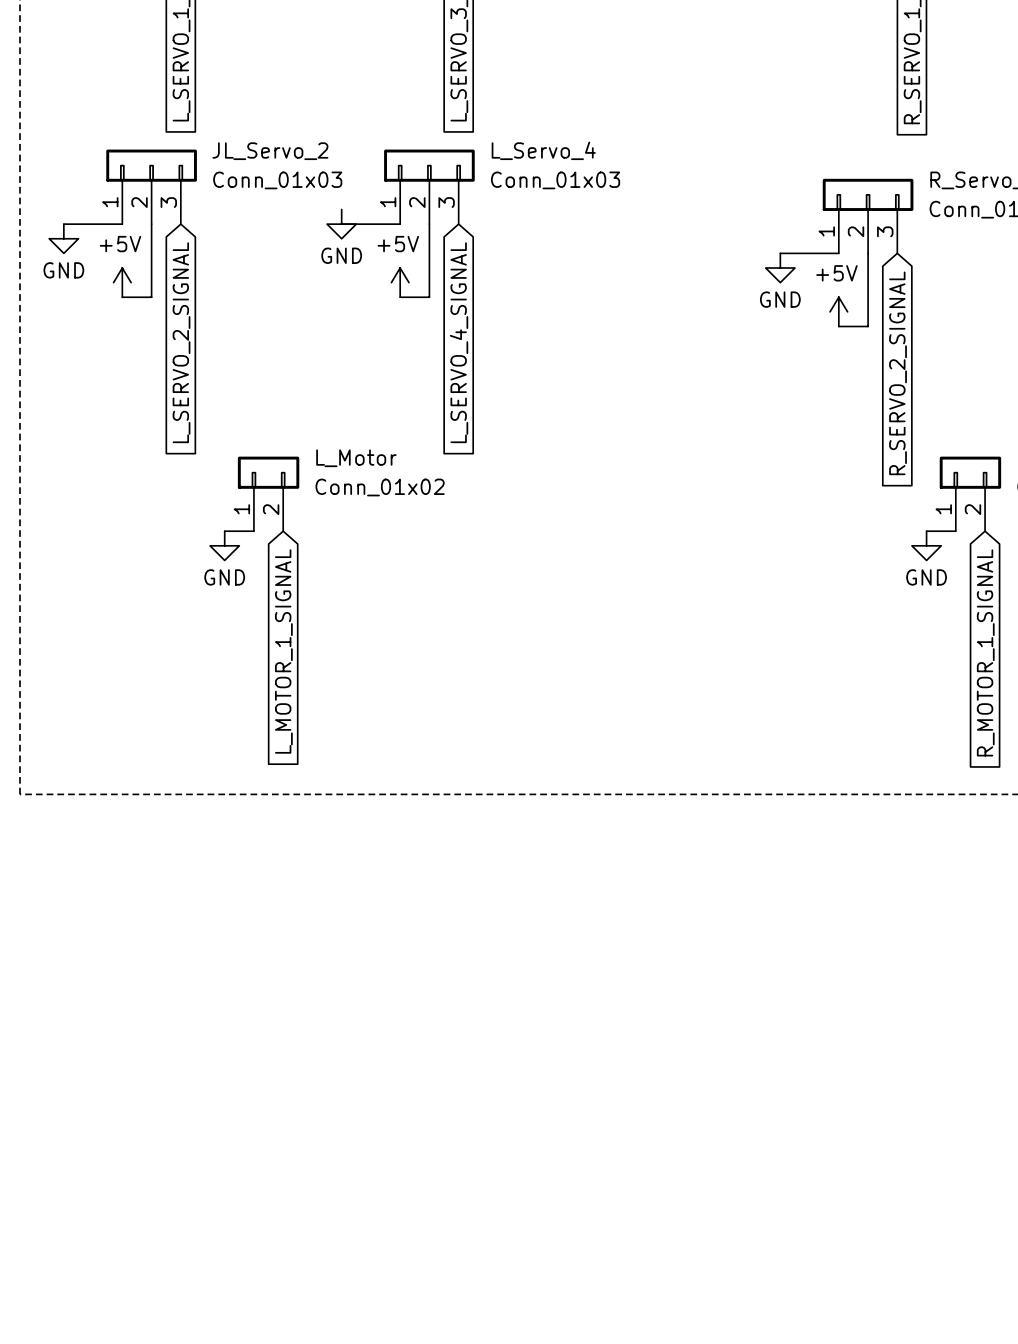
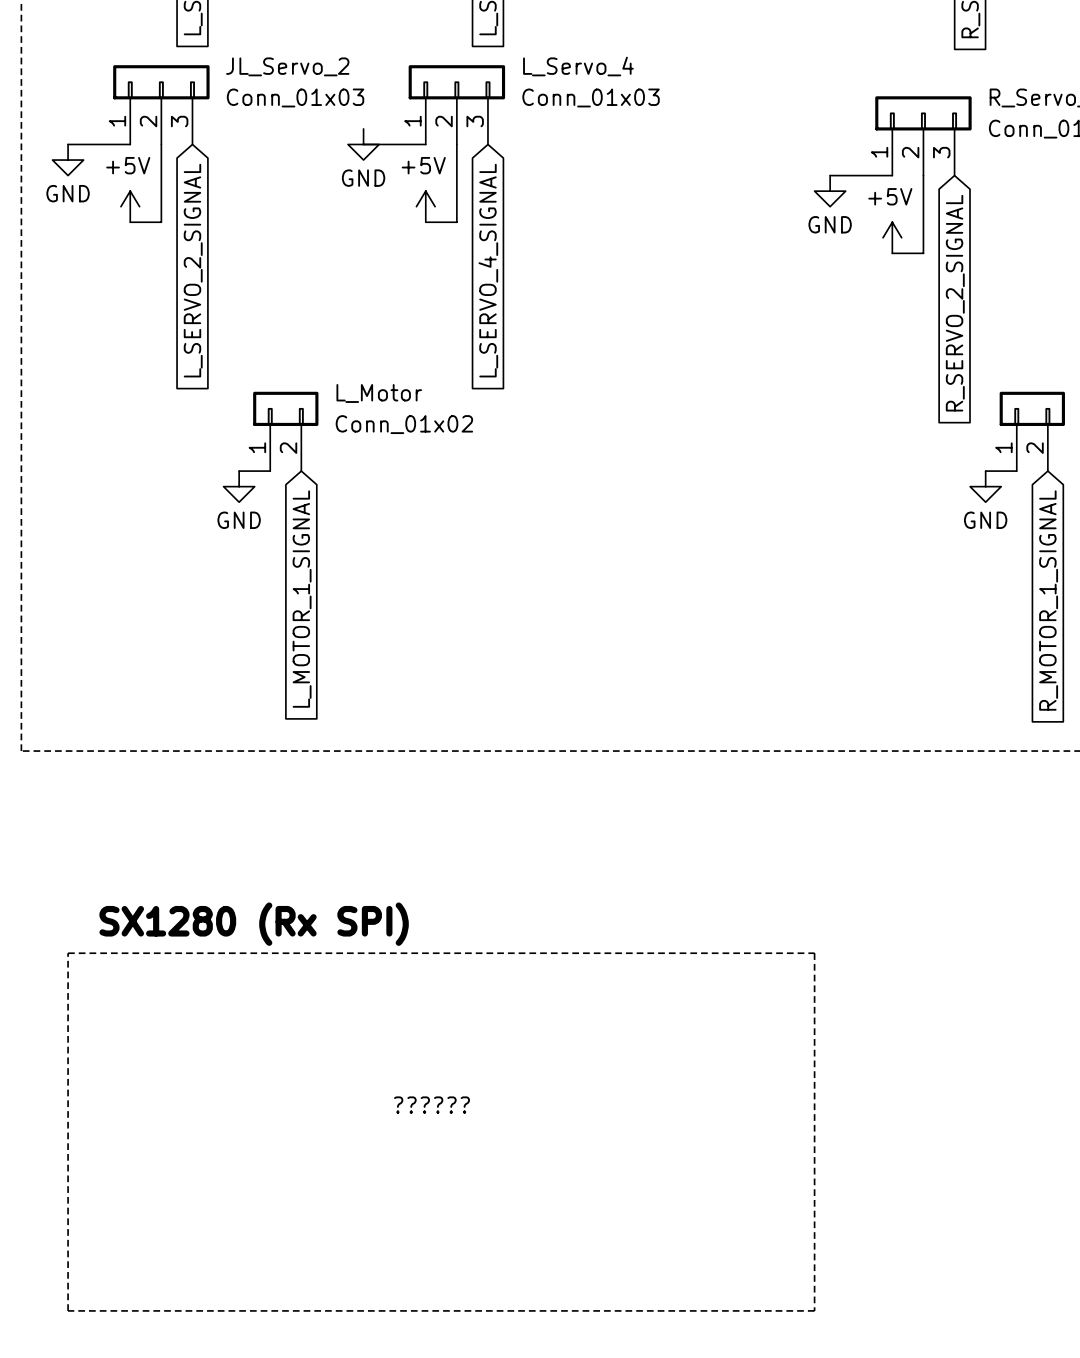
text: none -> SX1280 (Rx SPI) (254, 924)
line: none -> (68, 953) (814, 953) (814, 1310) (68, 1310) (68, 953)
text: none -> ?????? (431, 1105)

